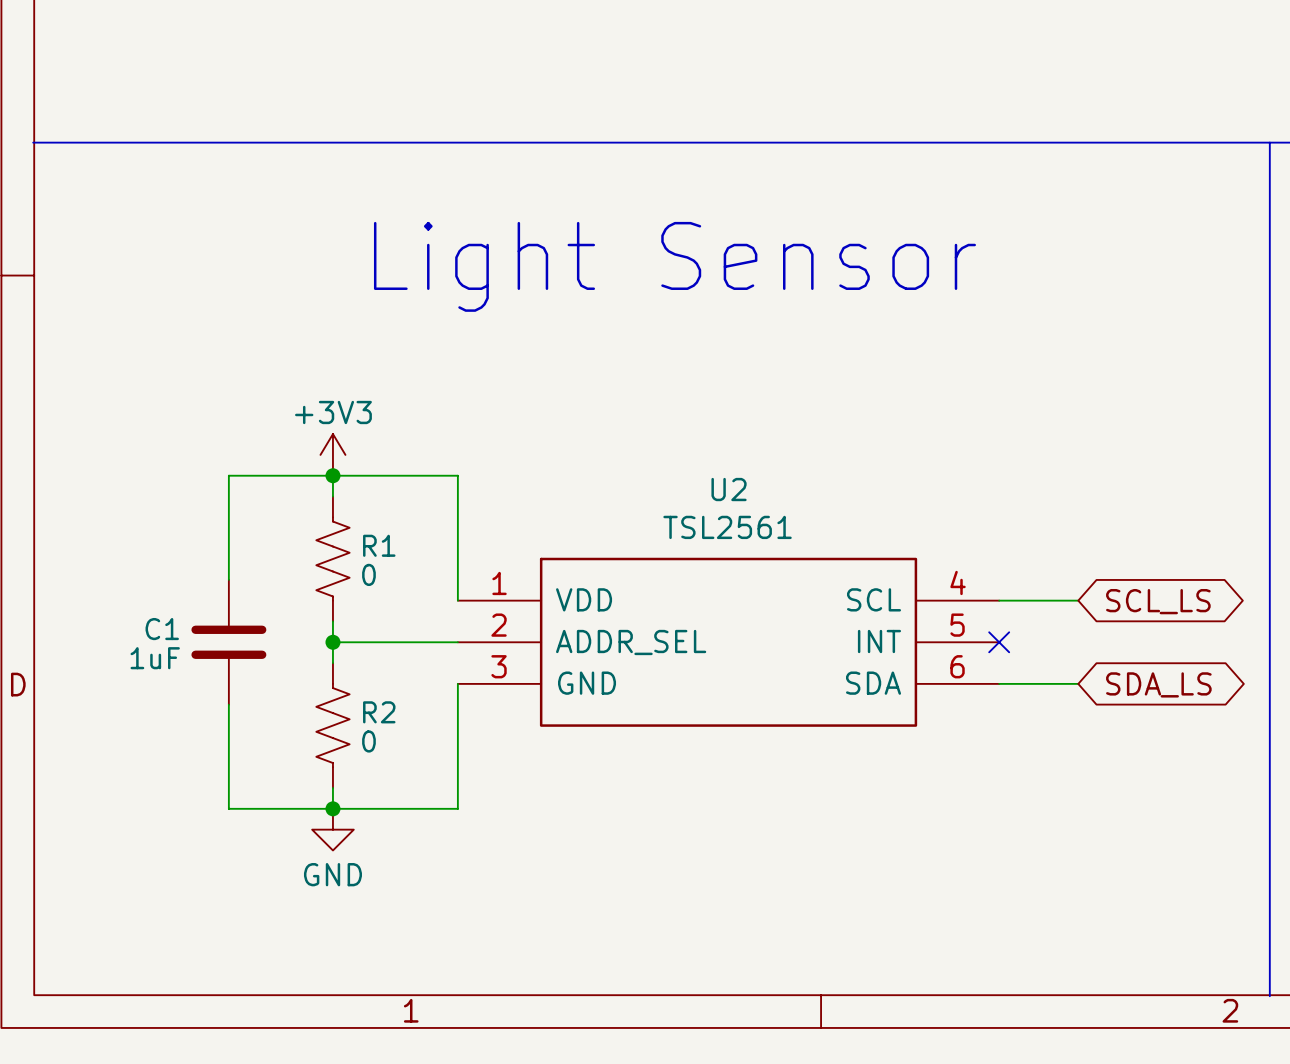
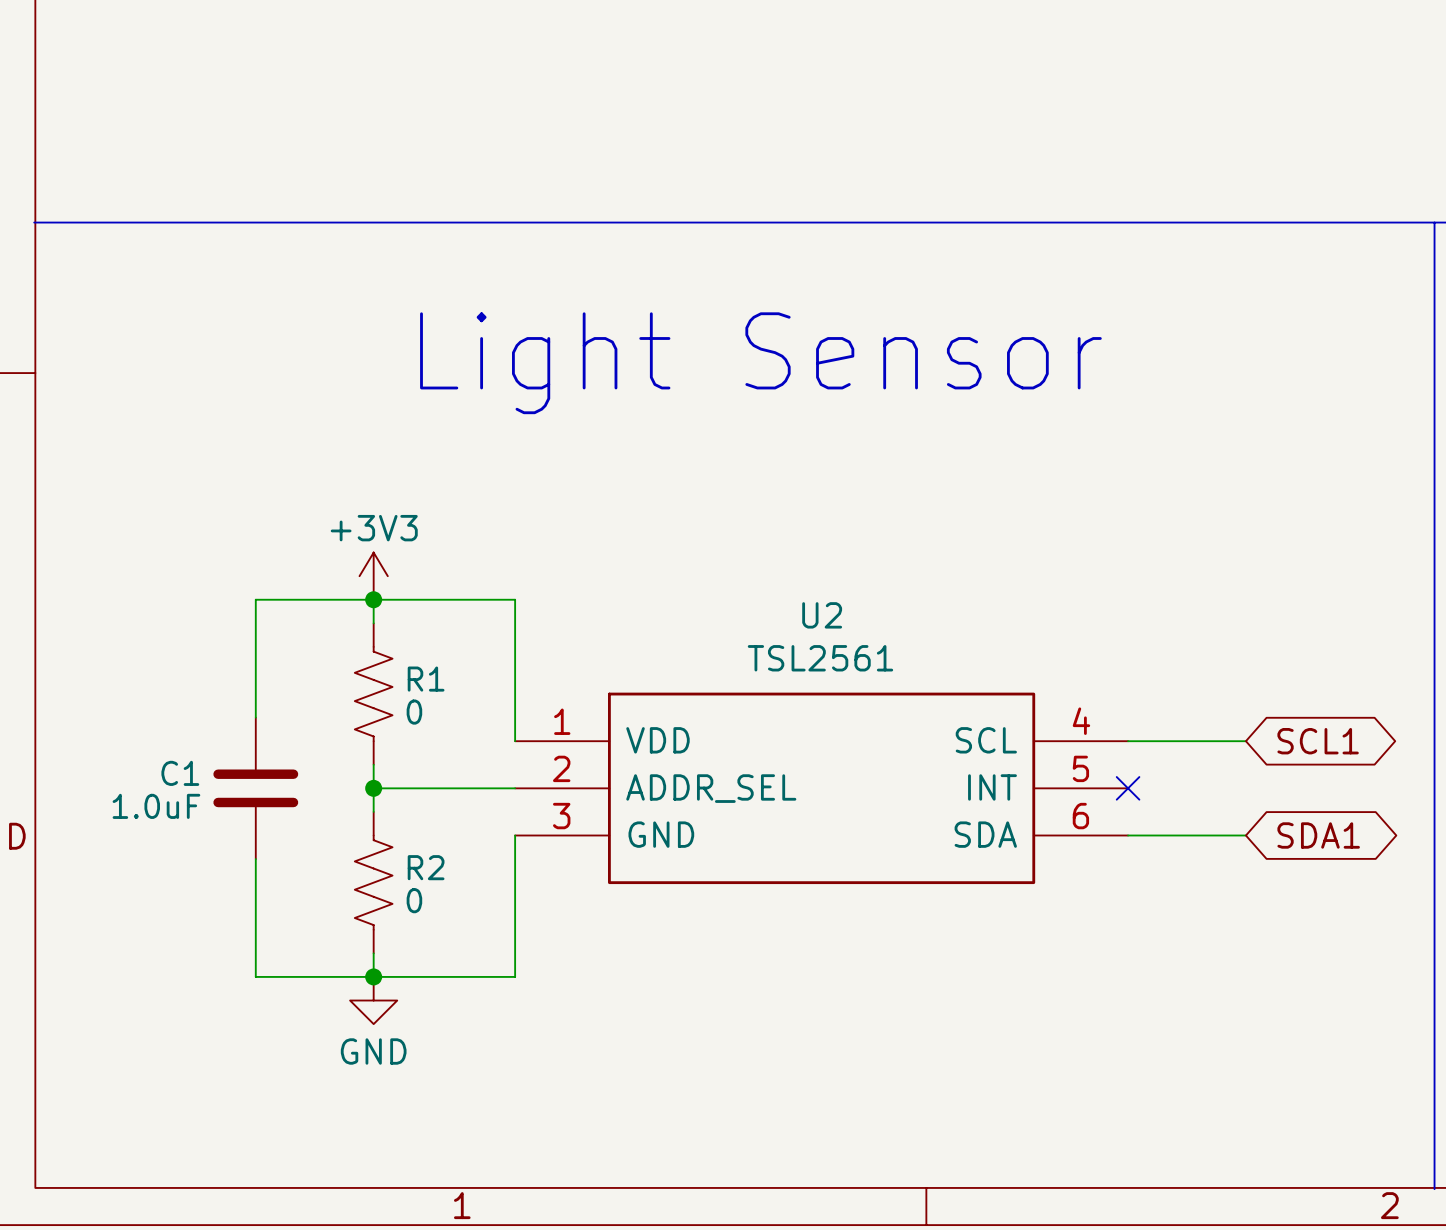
wire: none -> (1217, 741) (1245, 741)
global label: none -> SCL1 (1318, 741)
global label: SCL_LS (1158, 601) -> none
C1 value: 1uF (155, 658) -> 1.0uF (156, 806)
wire: none -> (1217, 835) (1245, 835)
global label: none -> SDA1 (1318, 835)
global label: SDA_LS (1158, 684) -> none

